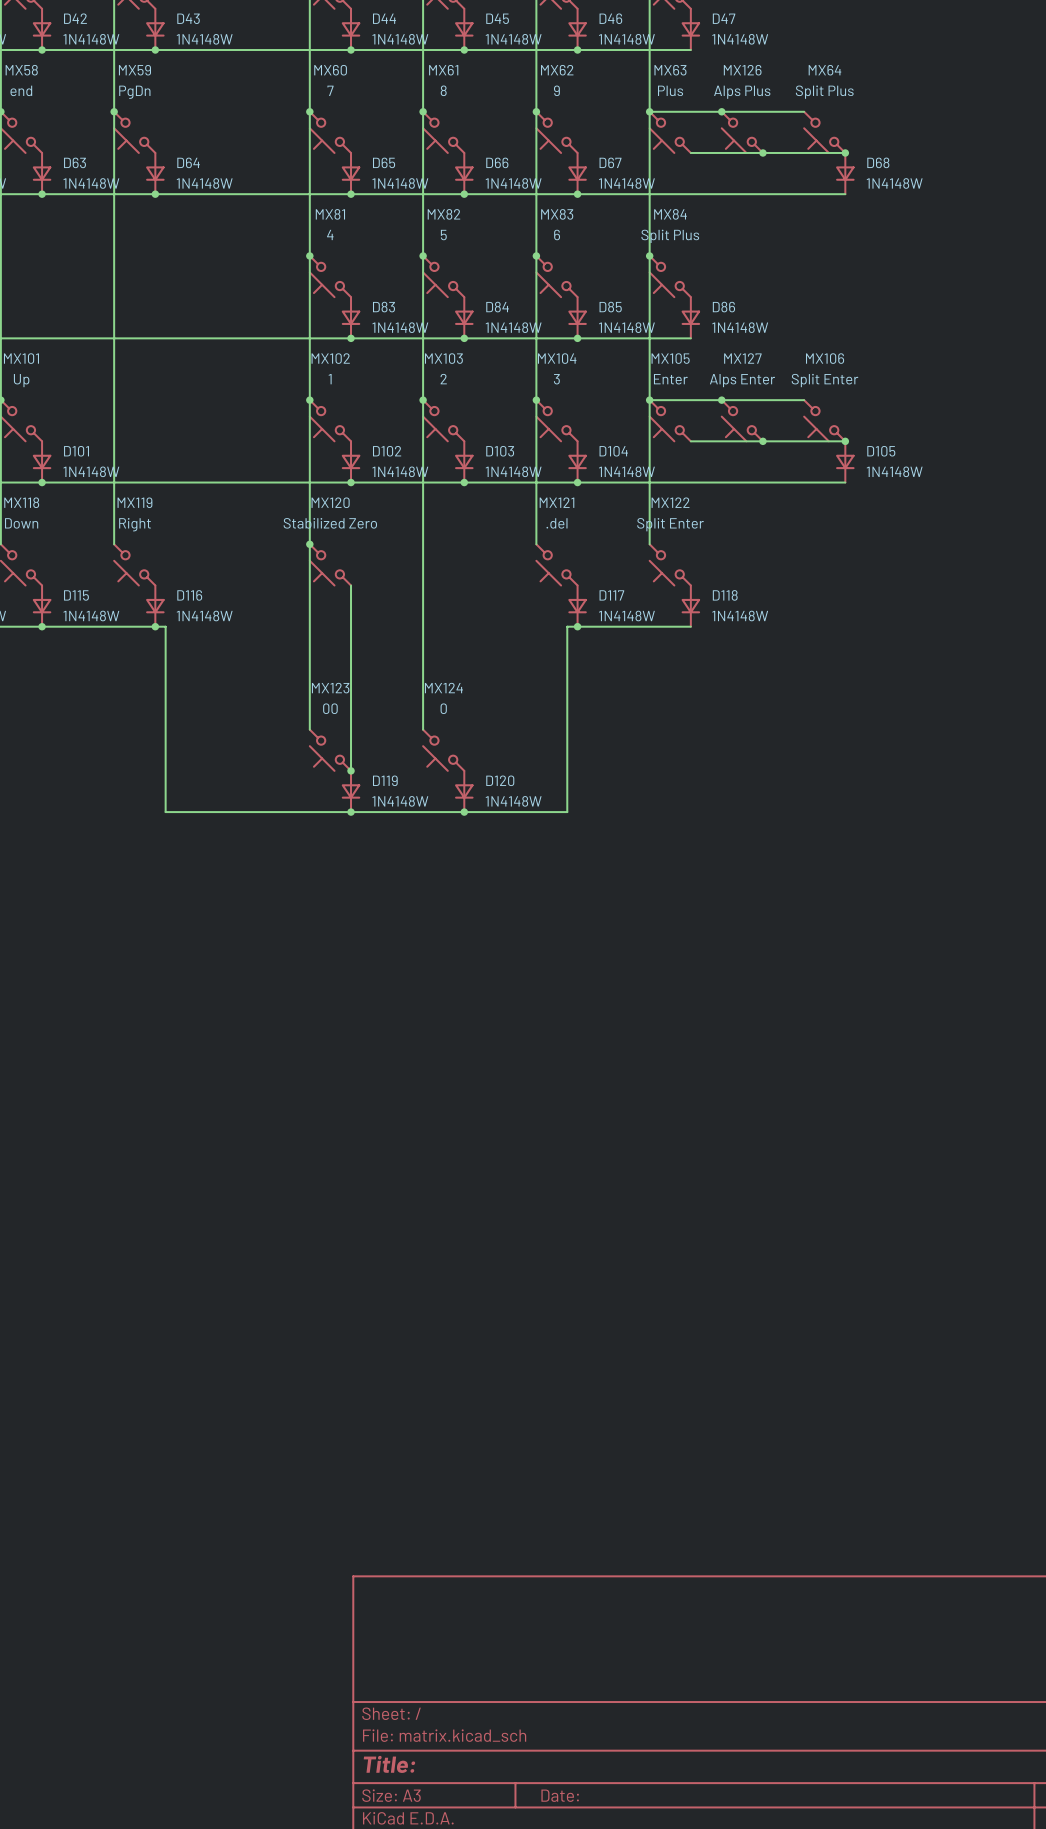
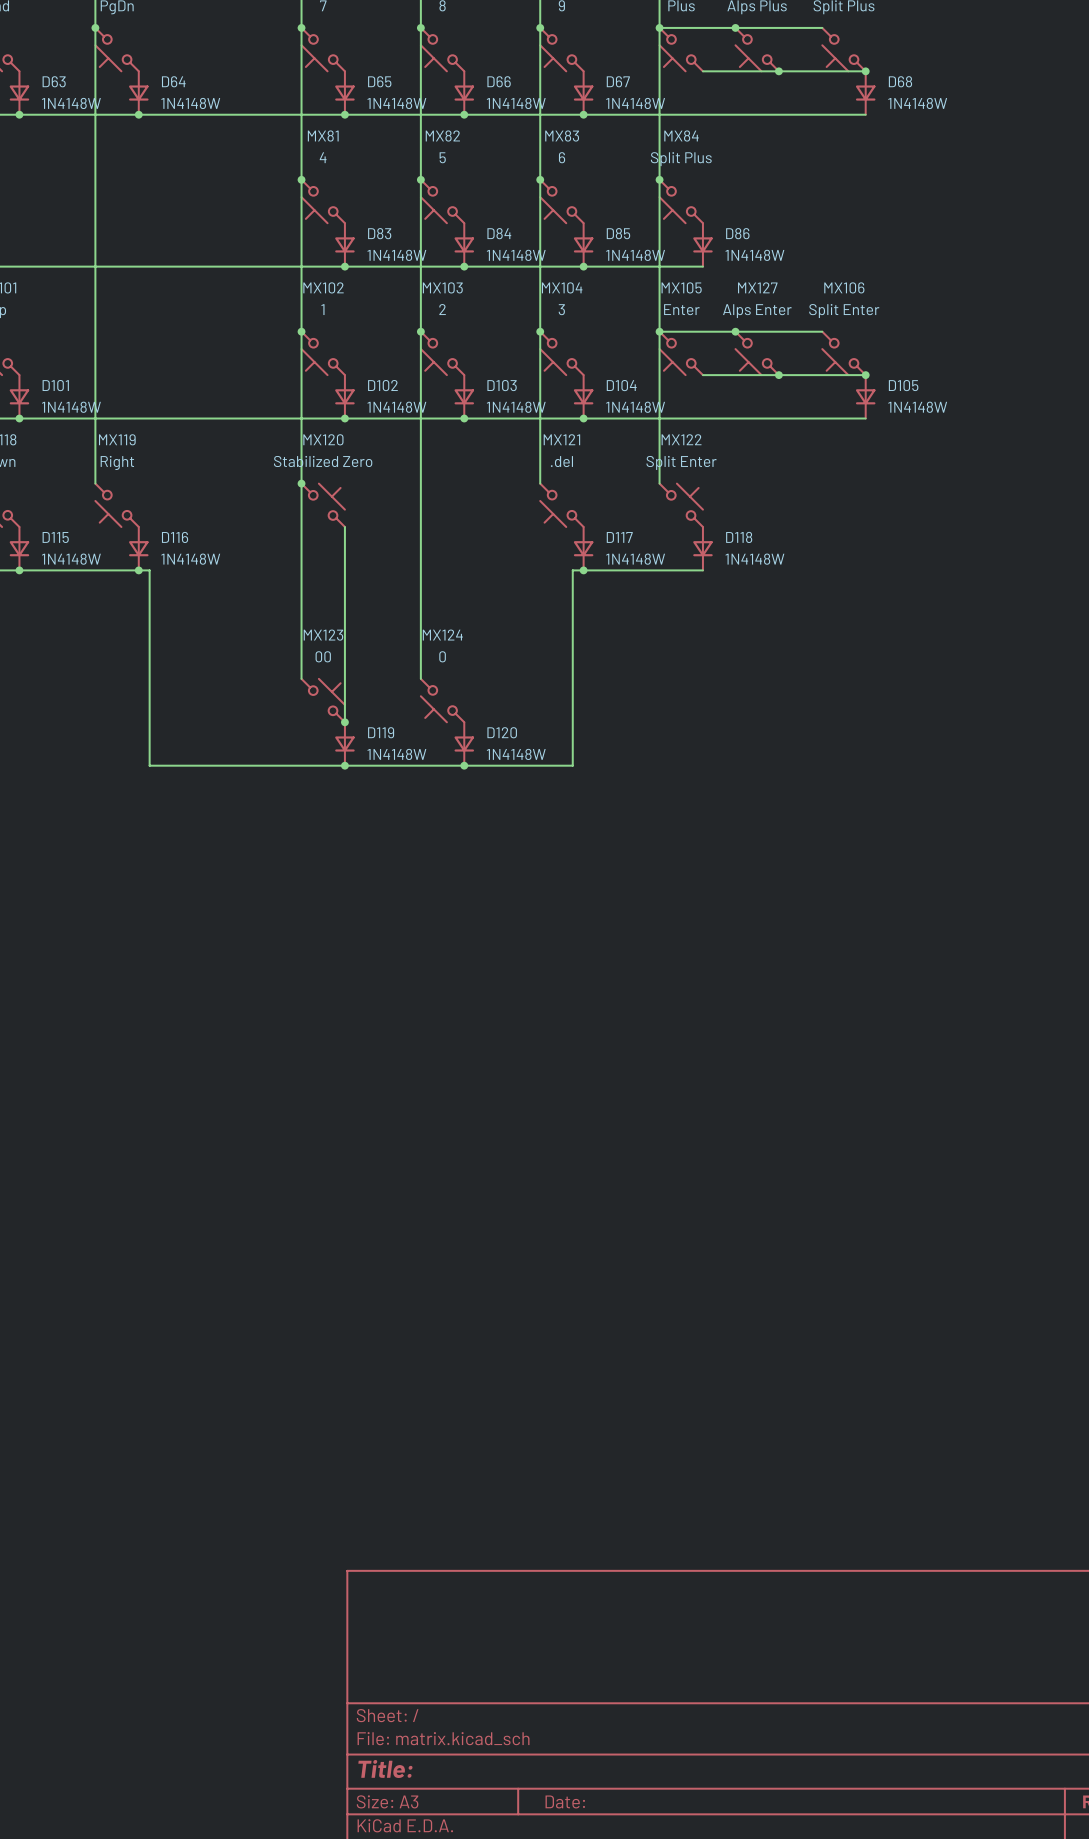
MX120 rotation: 0° (330, 564) -> 180° (323, 505)
MX122 rotation: 0° (670, 564) -> 180° (681, 505)
MX123 rotation: 0° (330, 750) -> 180° (323, 700)

